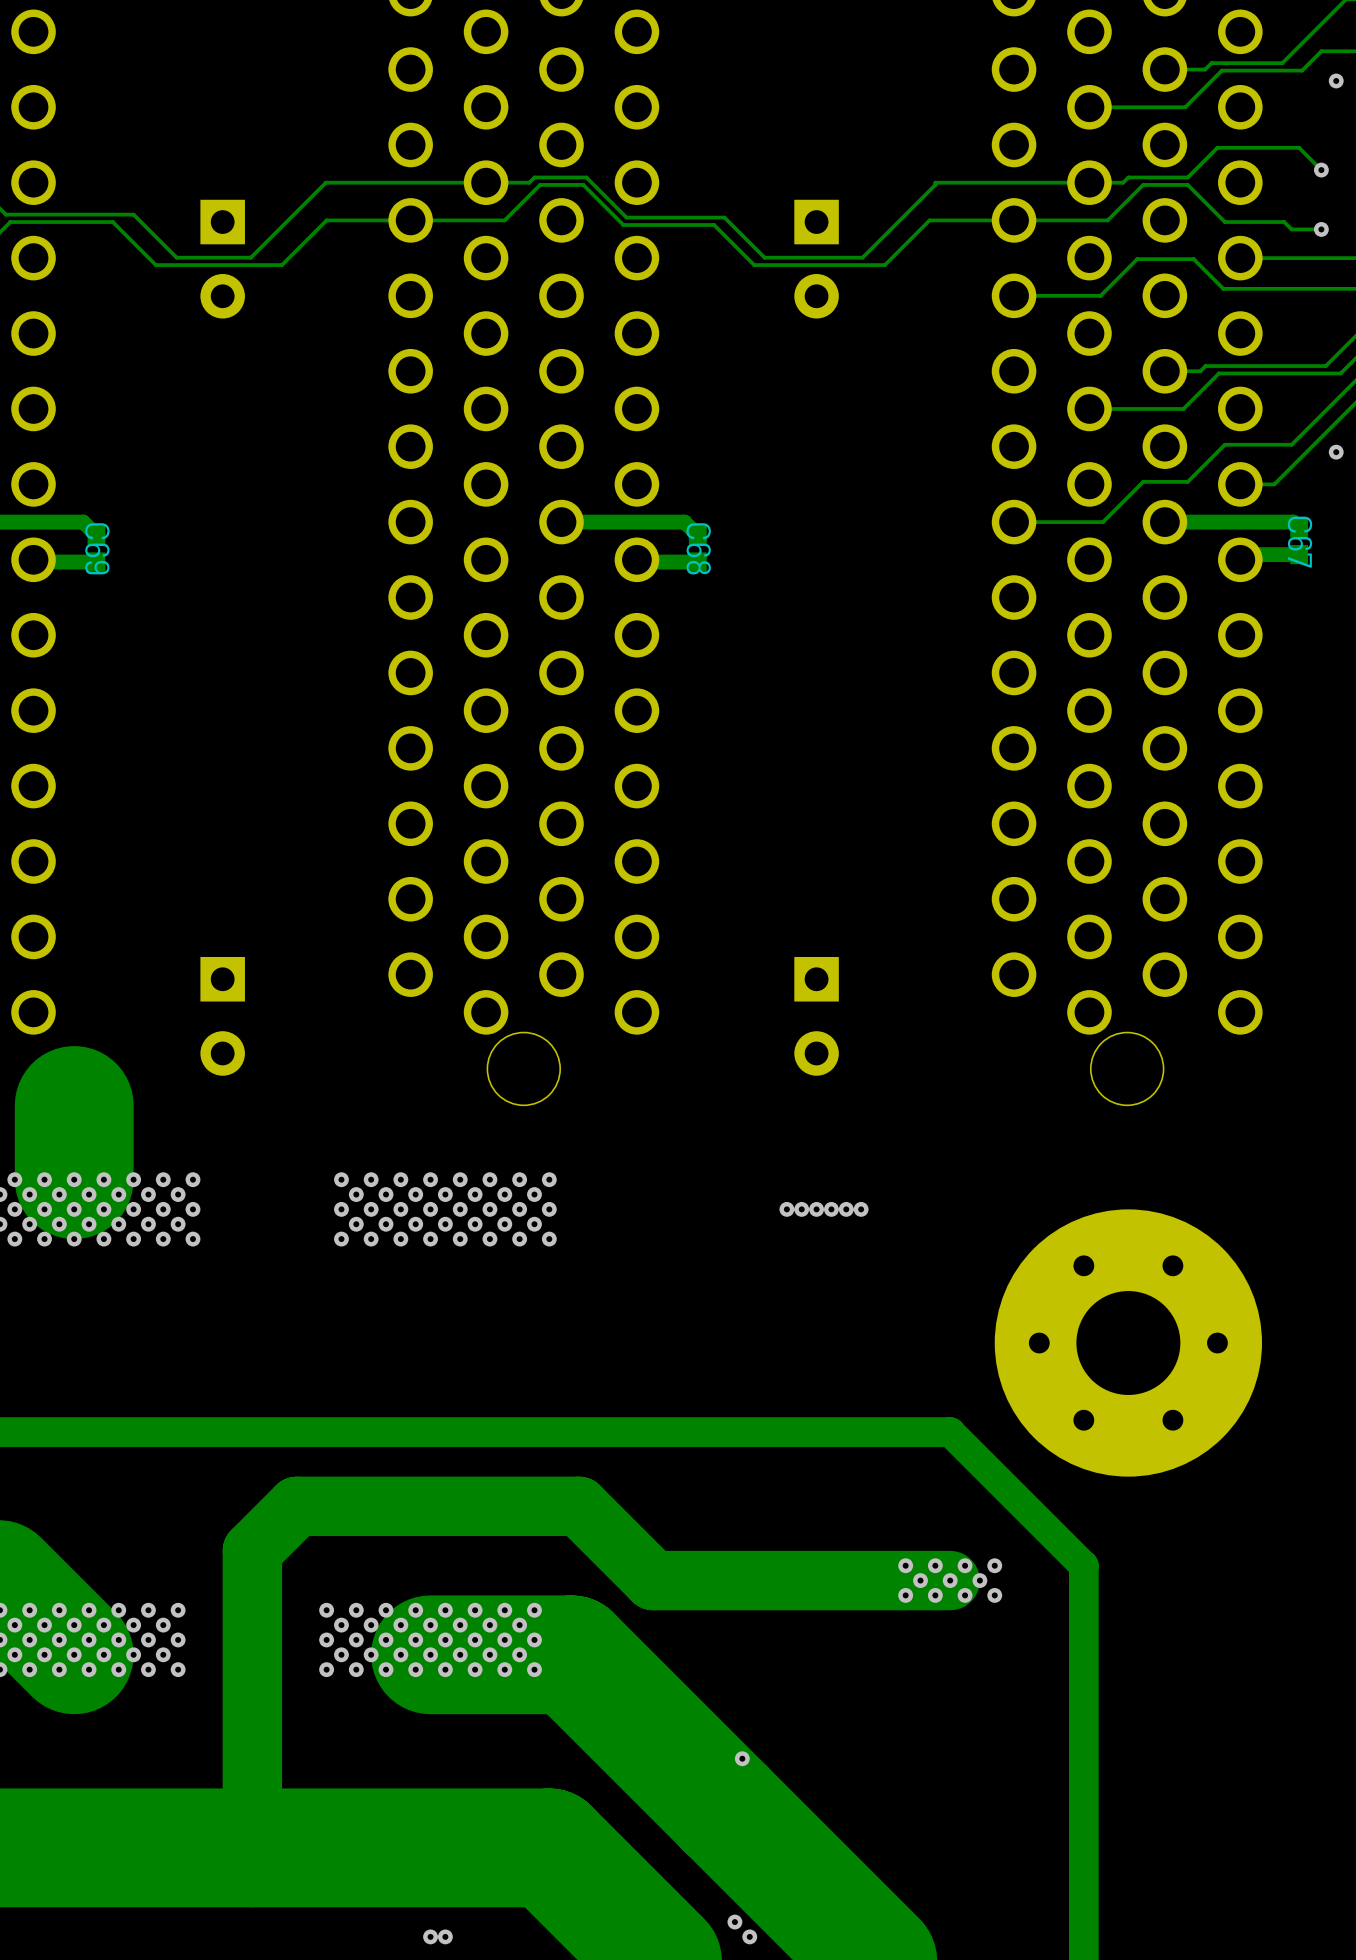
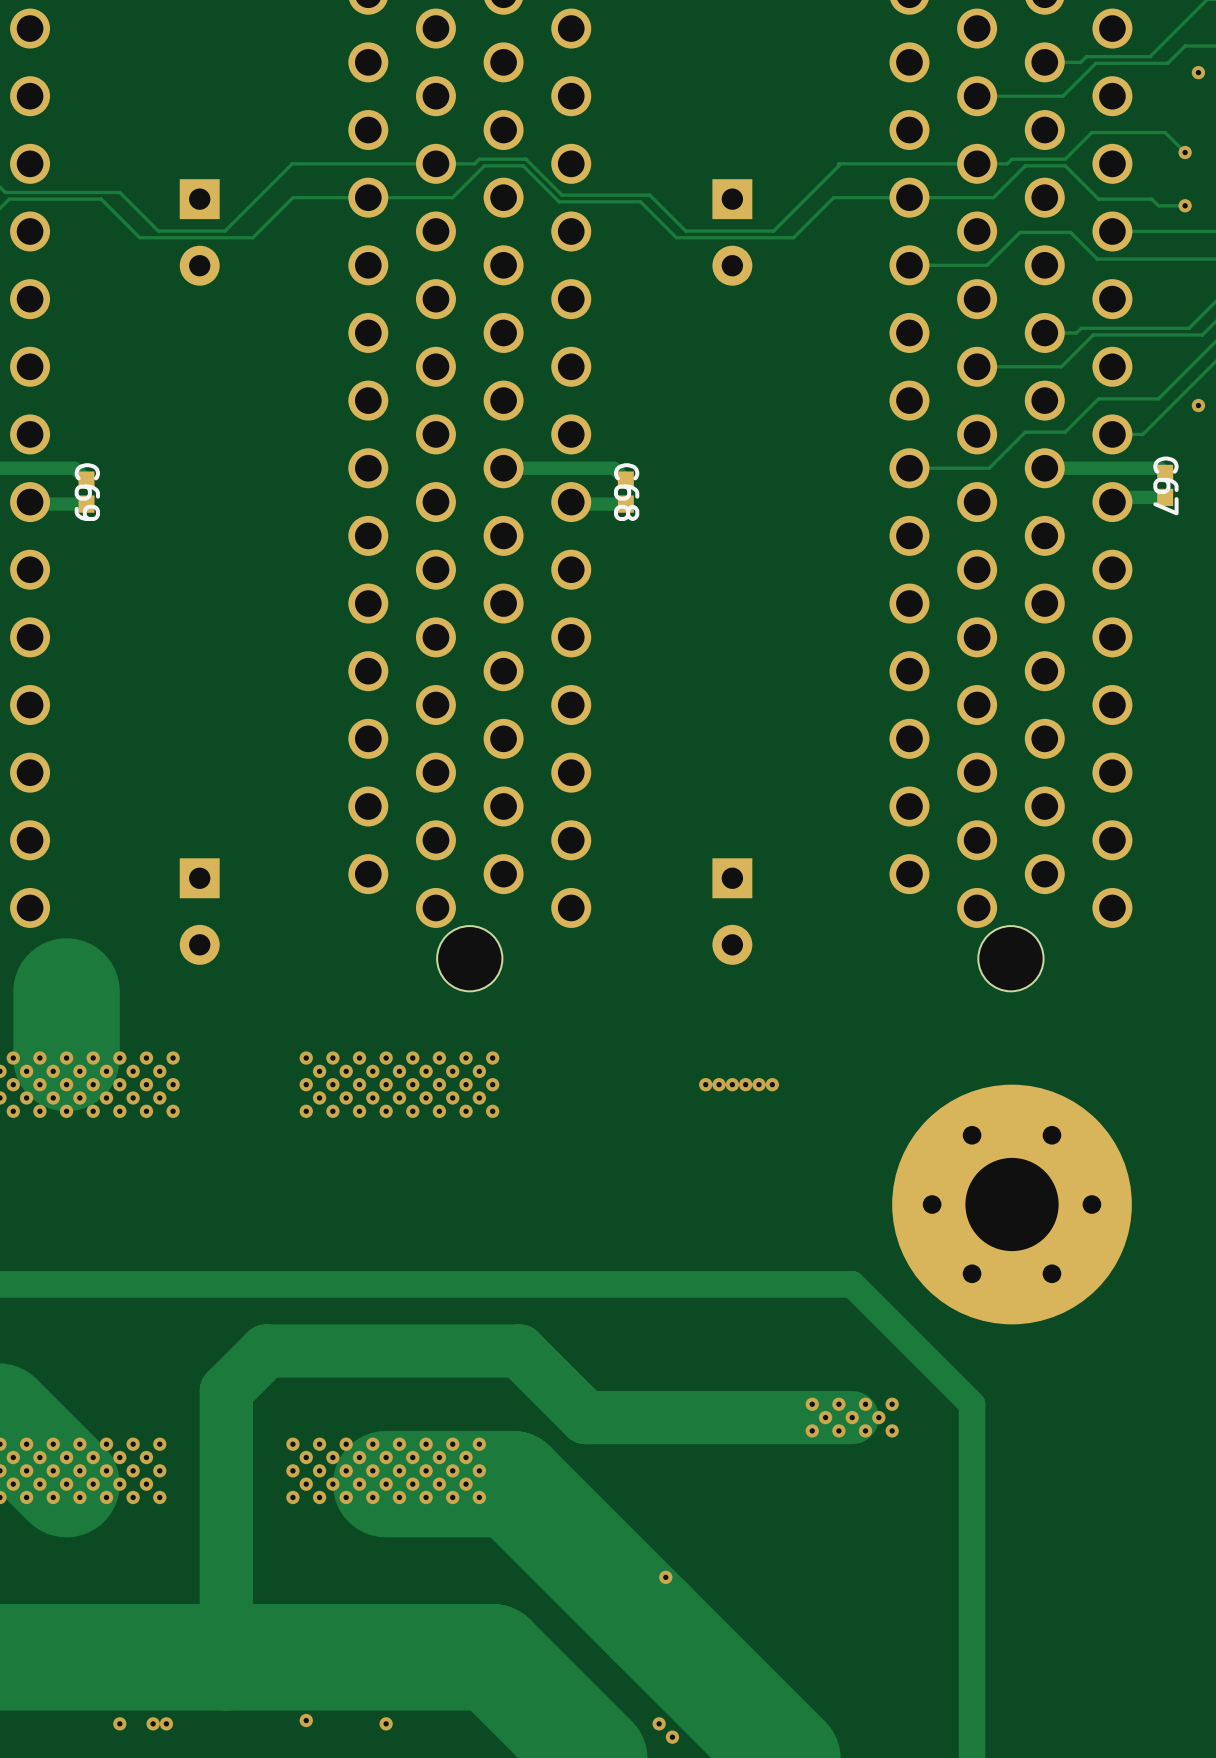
via: none -> (306, 1720)
via: none -> (119, 1723)
via: none -> (153, 1723)
via: none -> (166, 1723)
via: none -> (386, 1723)
via: (430, 1936) -> none
via: (445, 1936) -> none

